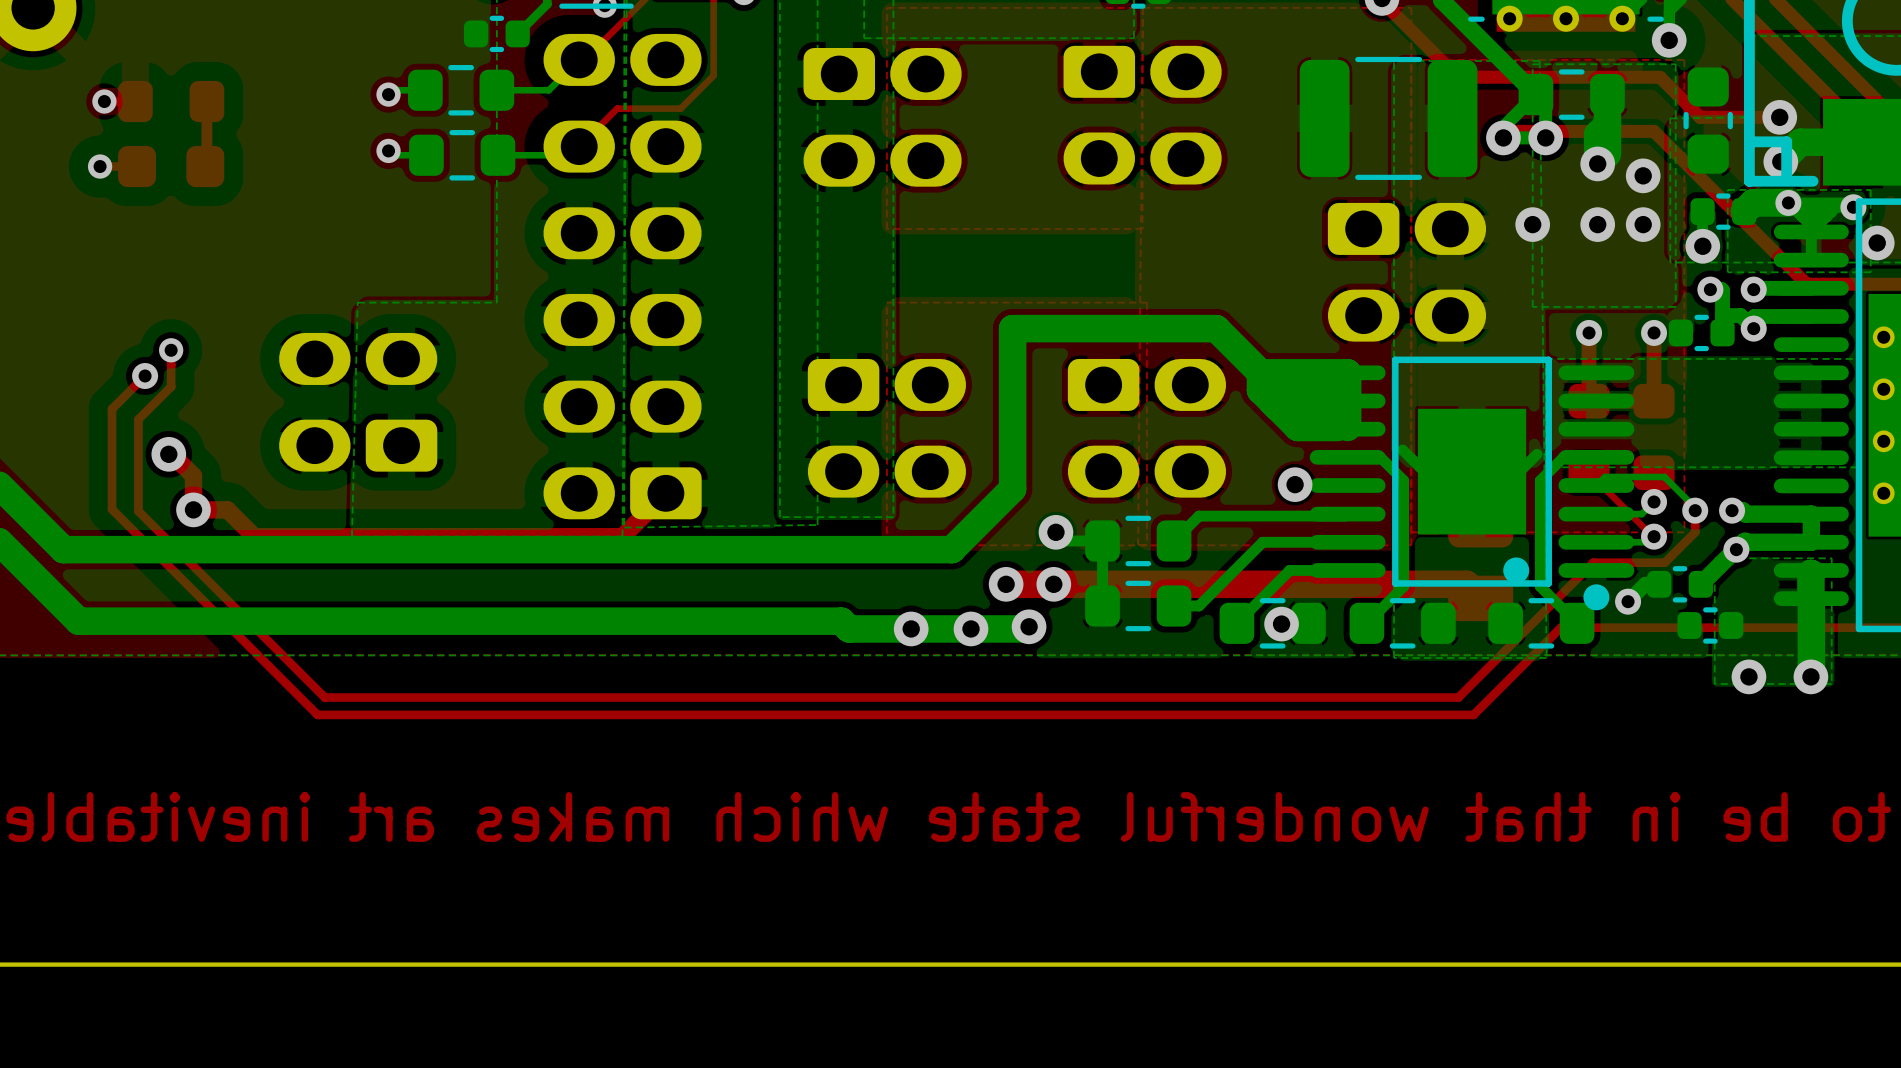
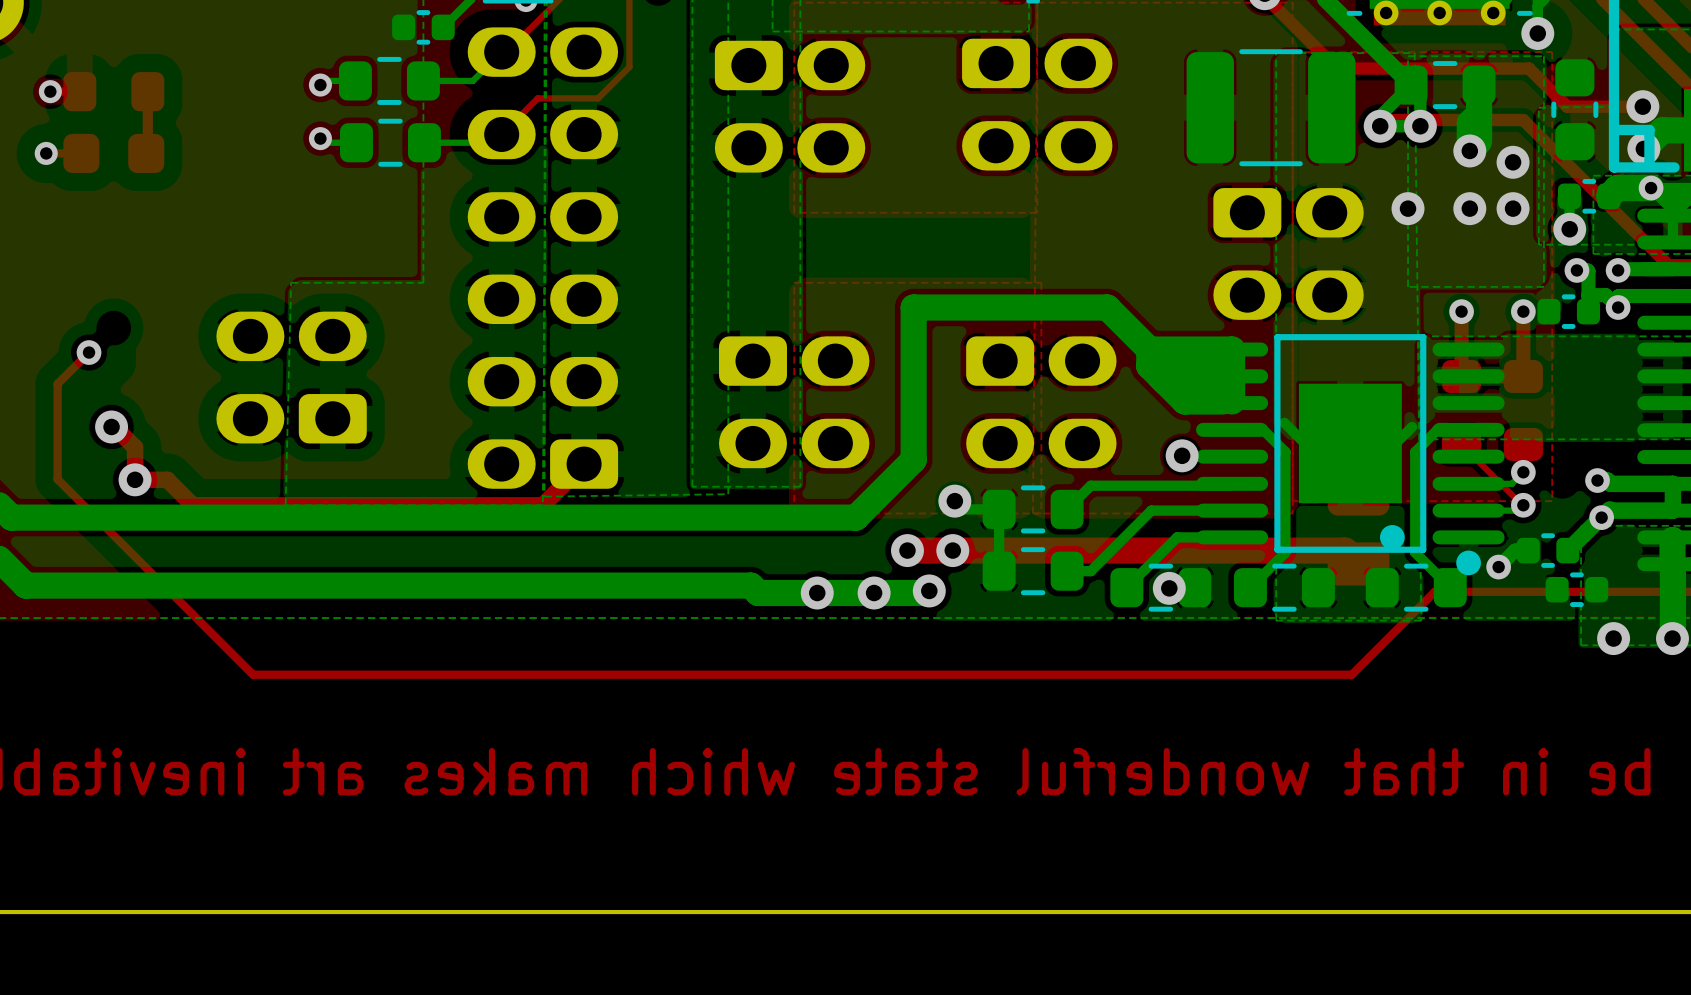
top track: (171, 350) (171, 386) (138, 419) (138, 511) (324, 697) (1458, 697) (1593, 562) (1664, 562) (1695, 532) (1695, 510) -> none
via: (171, 350) -> none
bottom track: (1596, 485) (1604, 476) (1664, 476) (1695, 507) (1695, 510) -> none
via: (1695, 510) -> none

